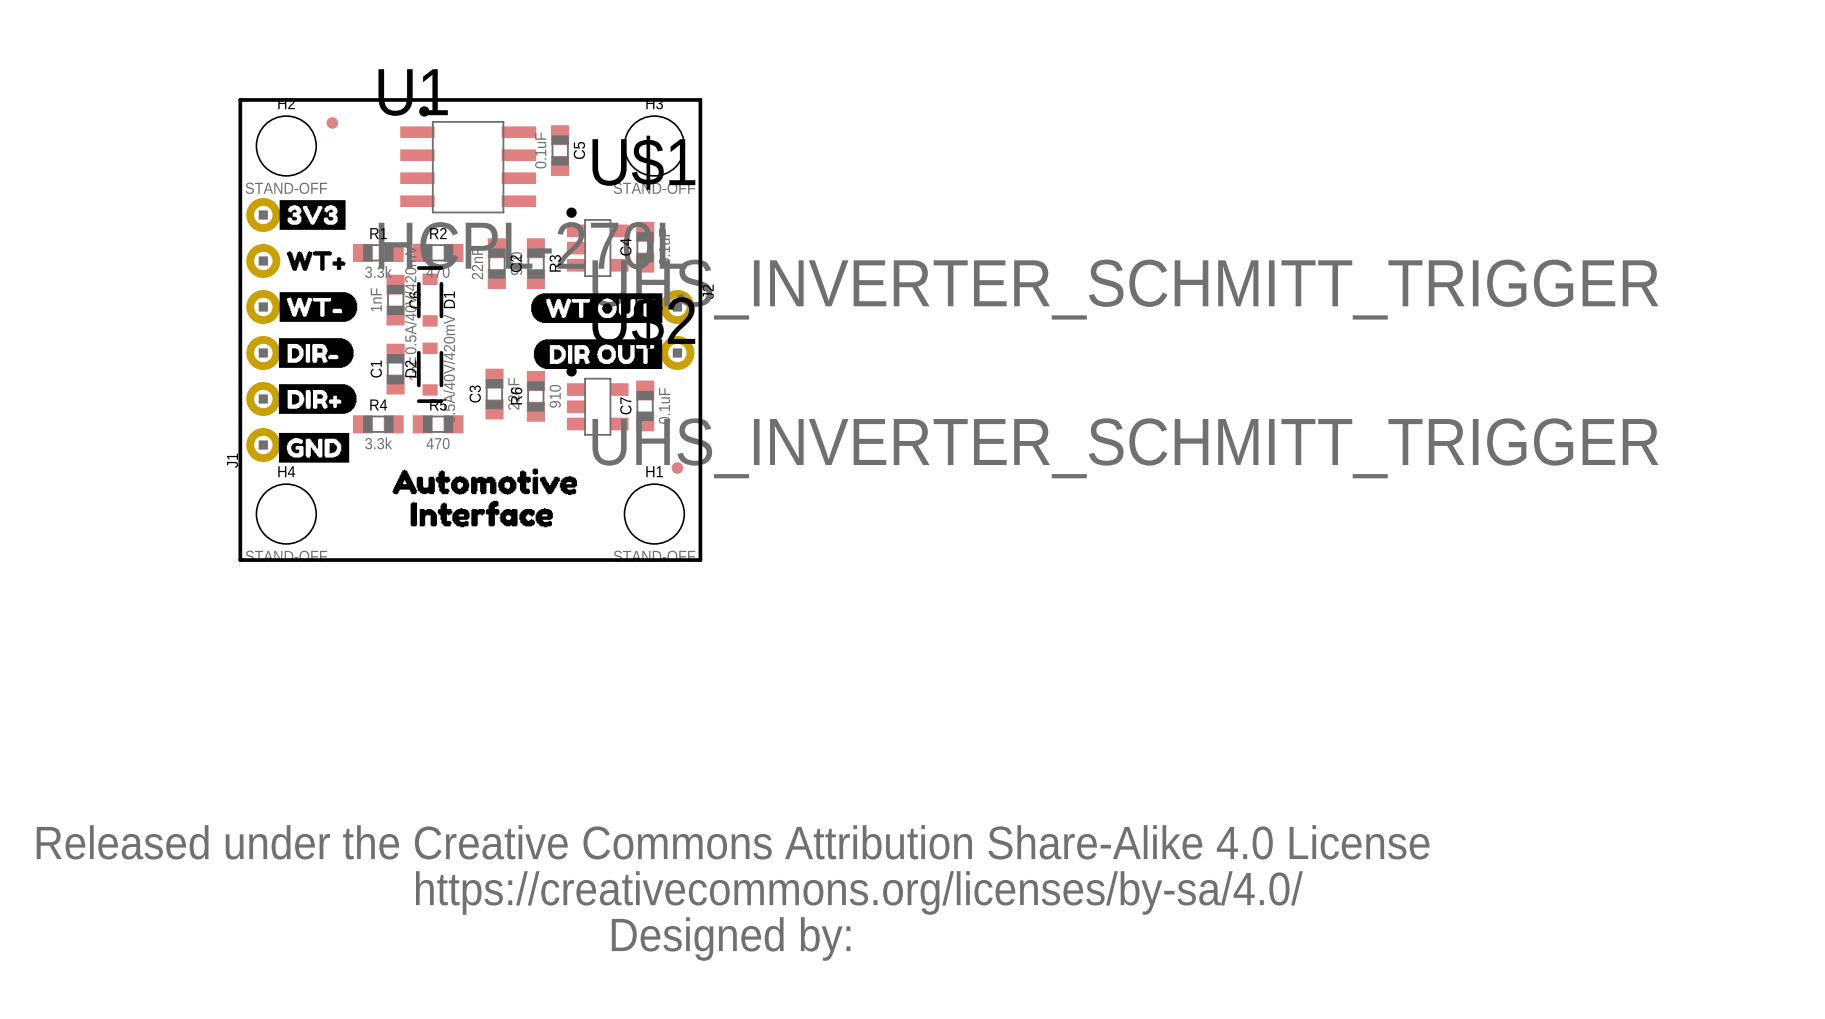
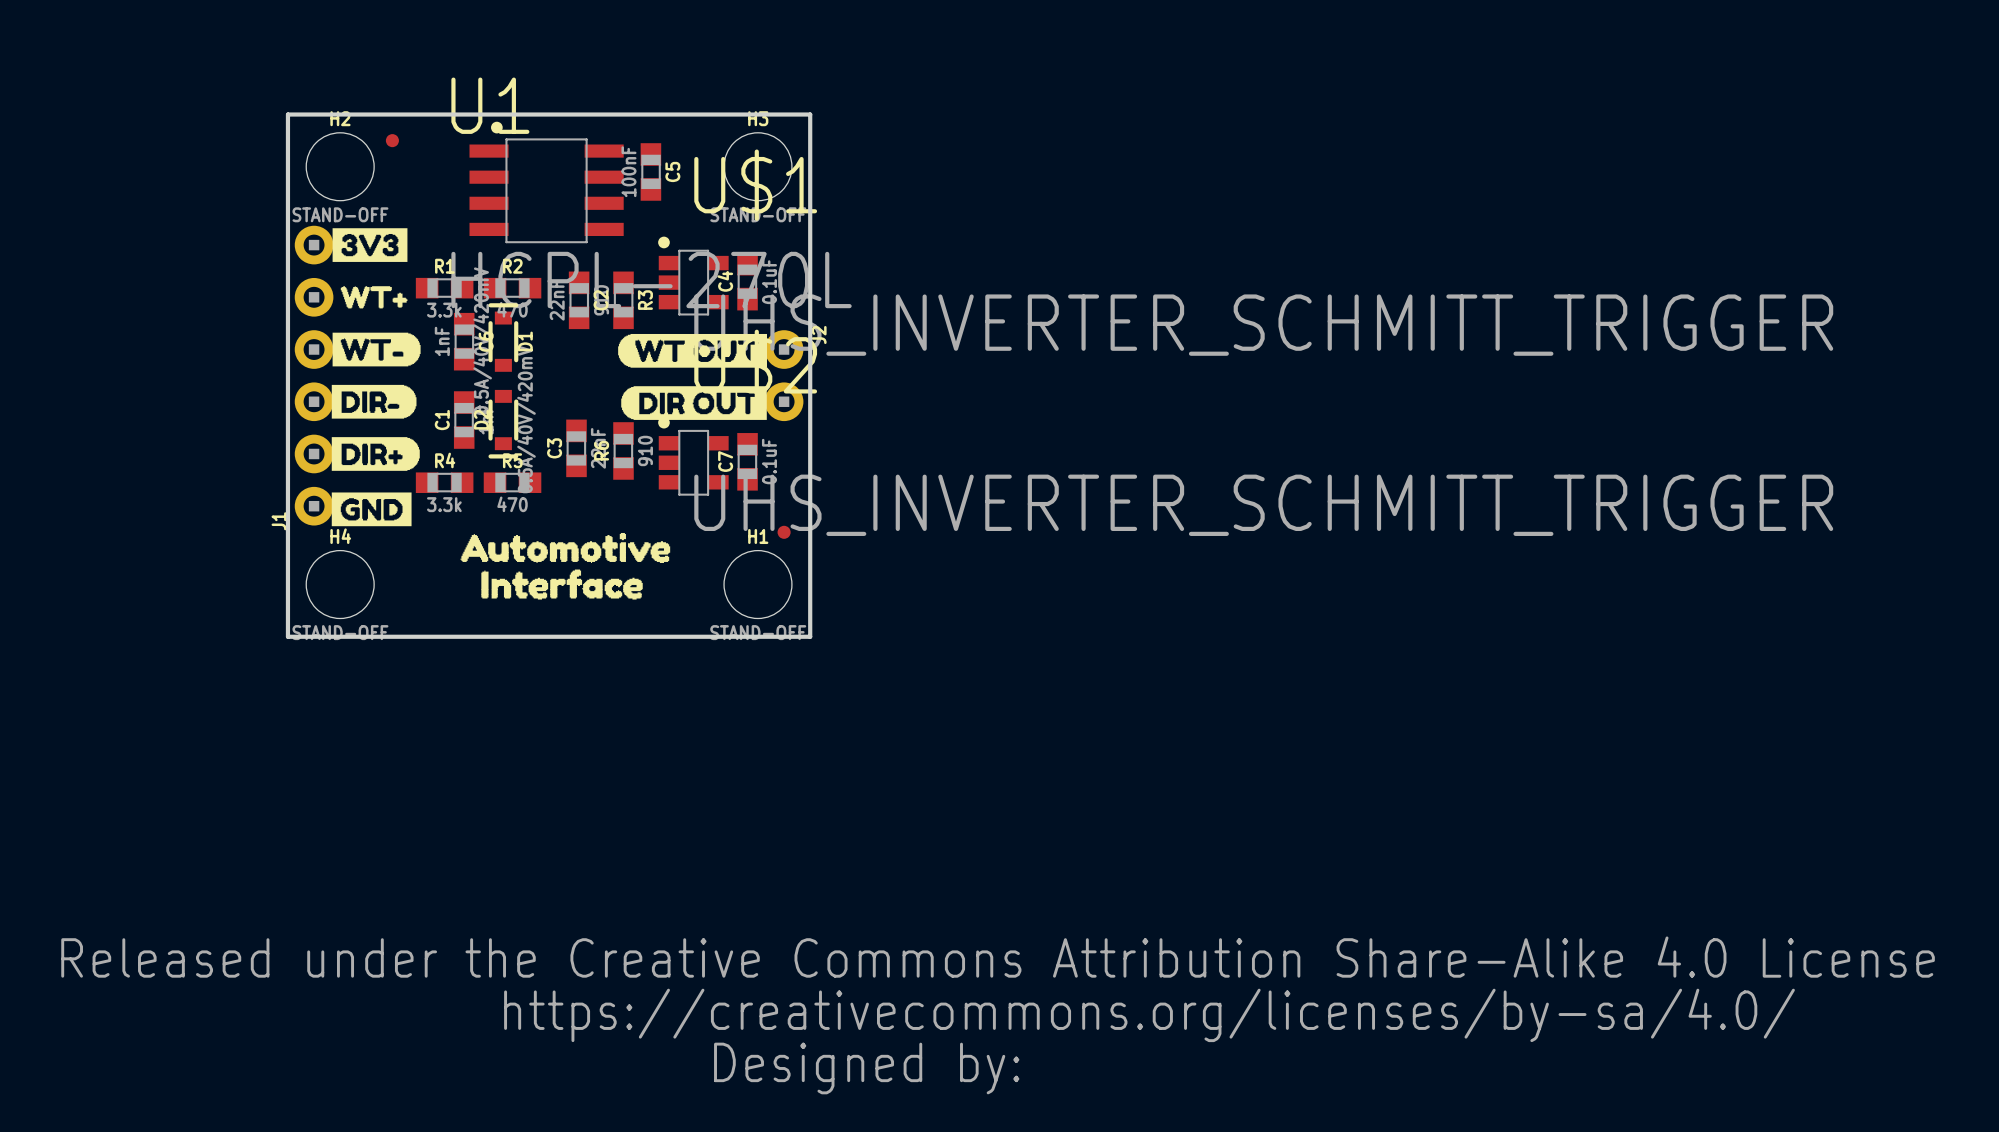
C5 value: 0.1uF (540, 150) -> 100nF (628, 171)

